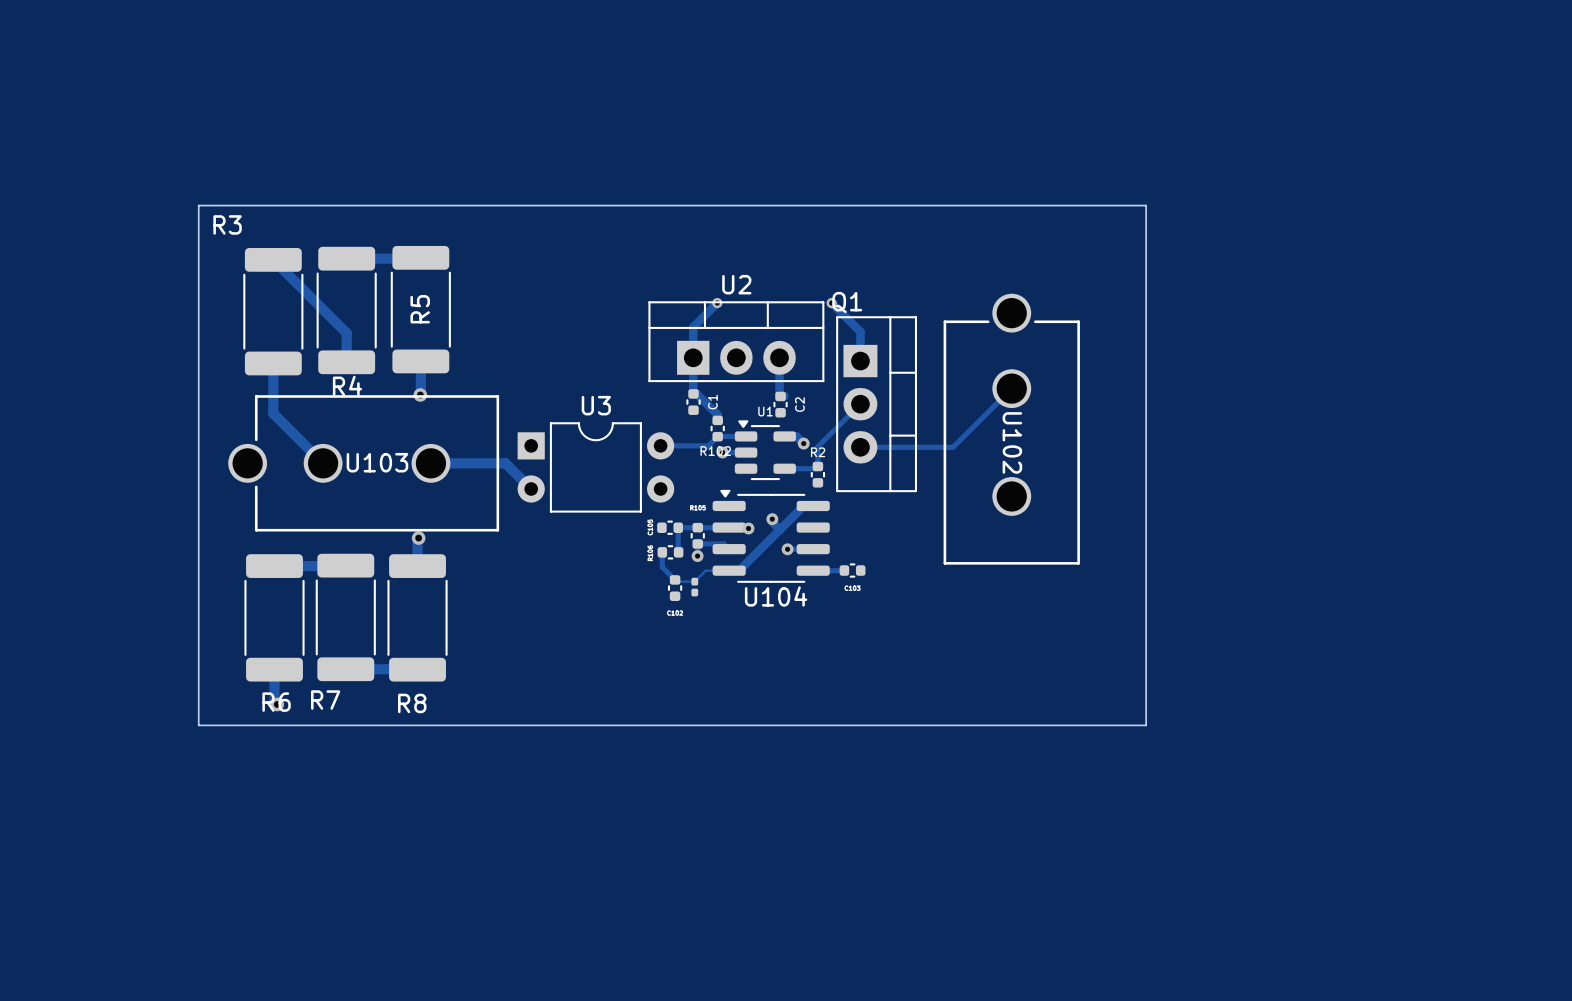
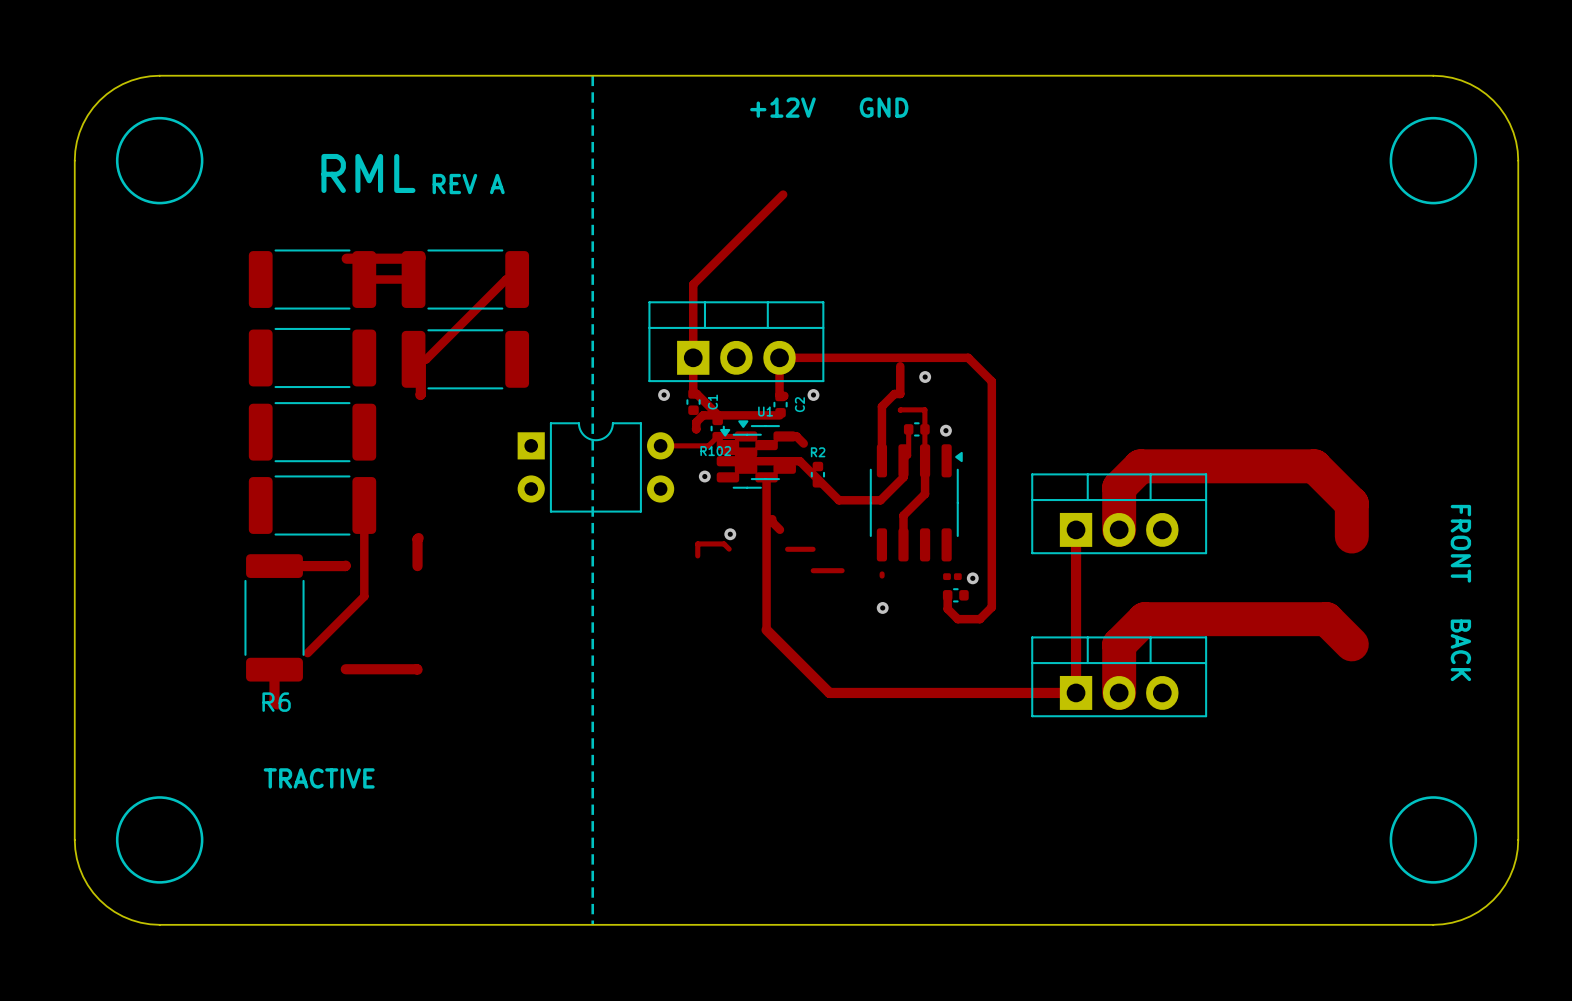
board edge: none -> (159, 75) (1433, 75) (1452, 77) (1478, 88) (1493, 100) (1509, 123) (1516, 141) (1518, 160) (1518, 839) (1513, 867) (1505, 885) (1493, 899) (1478, 911) (1461, 920) (1433, 924) (159, 924) (140, 922) (114, 911) (99, 899) (87, 885) (79, 867) (74, 839) (74, 160) (76, 141) (83, 123) (99, 100) (122, 84) (140, 77) (159, 75)
line: none -> (592, 75) (592, 924)
text: none -> +12V (782, 107)
text: none -> GND (884, 107)
drawing: none -> [115, 116, 204, 205]
drawing: none -> [1389, 116, 1478, 205]
text: none -> RML (368, 173)
text: none -> REV A (468, 184)
board edge: (198, 205) (1146, 205) (1146, 725) (198, 725) (198, 205) -> none
track: (273, 259) (346, 333) (346, 362) -> none
part: none -> (312, 279)
track: none -> (364, 279) (413, 279)
part: none -> (465, 279)
track: none -> (517, 279) (506, 279) (426, 359) (413, 359)
U2 name: U2 (736, 284) -> none
track: (717, 303) (693, 327) -> (783, 194) (693, 284) (693, 327)
via: (717, 303) -> none
track: (831, 303) (860, 331) (860, 361) -> none
via: (831, 303) -> none
R5: (420, 309) -> none
R4: (346, 310) -> none
R3: (273, 311) -> none
part: none -> (312, 357)
track: none -> (779, 357) (968, 357) (991, 381) (991, 607) (979, 619) (957, 619) (947, 608) (947, 595)
part: none -> (465, 359)
track: (273, 363) (273, 413) (323, 463) -> none
track: none -> (900, 366) (900, 393) (894, 393) (881, 406) (881, 470)
via: none -> (925, 377)
track: (1011, 388) (953, 447) (860, 447) -> none
via: (420, 394) -> none
via: none -> (664, 394)
track: (860, 404) (817, 446) (817, 466) (815, 468) (784, 468) -> none
Q1: (876, 404) -> none
U3 name: U3 (596, 405) -> none
track: none -> (900, 410) (924, 409) (924, 460)
track: none -> (779, 415) (703, 415) (696, 422) (695, 428)
track: none -> (908, 429) (908, 455) (903, 460) (903, 477) (880, 500) (838, 500) (799, 461) (727, 461)
part: none -> (916, 429)
U102: (1011, 429) -> none
via: none -> (945, 430)
part: none -> (312, 432)
via position: (803, 443) -> (813, 394)
via position: (722, 452) -> (704, 476)
part: none -> (747, 458)
track: none -> (925, 460) (925, 494) (903, 515) (903, 544)
U103: (363, 463) -> none
track: (430, 463) (505, 463) (531, 488) -> none
track: none -> (766, 477) (766, 629) (829, 692) (1076, 692) (1076, 529)
part: none -> (916, 502)
part: none -> (312, 505)
track: none -> (364, 505) (364, 596) (307, 653)
track: (813, 505) (803, 505) (739, 570) (729, 570) -> none
part: none -> (1119, 513)
via: (772, 519) -> none
part: (670, 527) -> none
track: (729, 527) (678, 527) (678, 552) -> none
via position: (748, 528) -> (730, 534)
track: none -> (1119, 529) (1119, 487) (1140, 466) (1314, 466) (1351, 503) (1351, 536)
part: (697, 535) -> none
U104: (771, 536) -> none
via: (418, 538) -> none
text: none -> FRONT (1460, 543)
via: (787, 549) -> none
track: (662, 552) (662, 567) (676, 581) (694, 581) (705, 570) (729, 570) -> none
part: (670, 552) -> none
via: (697, 556) -> none
part: (852, 570) -> none
track: none -> (882, 573) (882, 576)
via: none -> (972, 578)
part rotation: 0° (694, 587) -> 90° clockwise (952, 576)
part position: (694, 587) -> (952, 576)
part: (675, 588) -> none
part: none -> (955, 595)
via: none -> (882, 607)
R7: (345, 617) -> none
R8: (417, 617) -> none
track: none -> (1351, 644) (1326, 619) (1144, 619) (1119, 644) (1119, 692)
text: none -> BACK (1460, 650)
part: none -> (1119, 676)
via: (277, 704) -> none
text: none -> TRACTIVE (319, 778)
drawing: none -> [115, 796, 204, 884]
drawing: none -> [1389, 796, 1478, 884]

